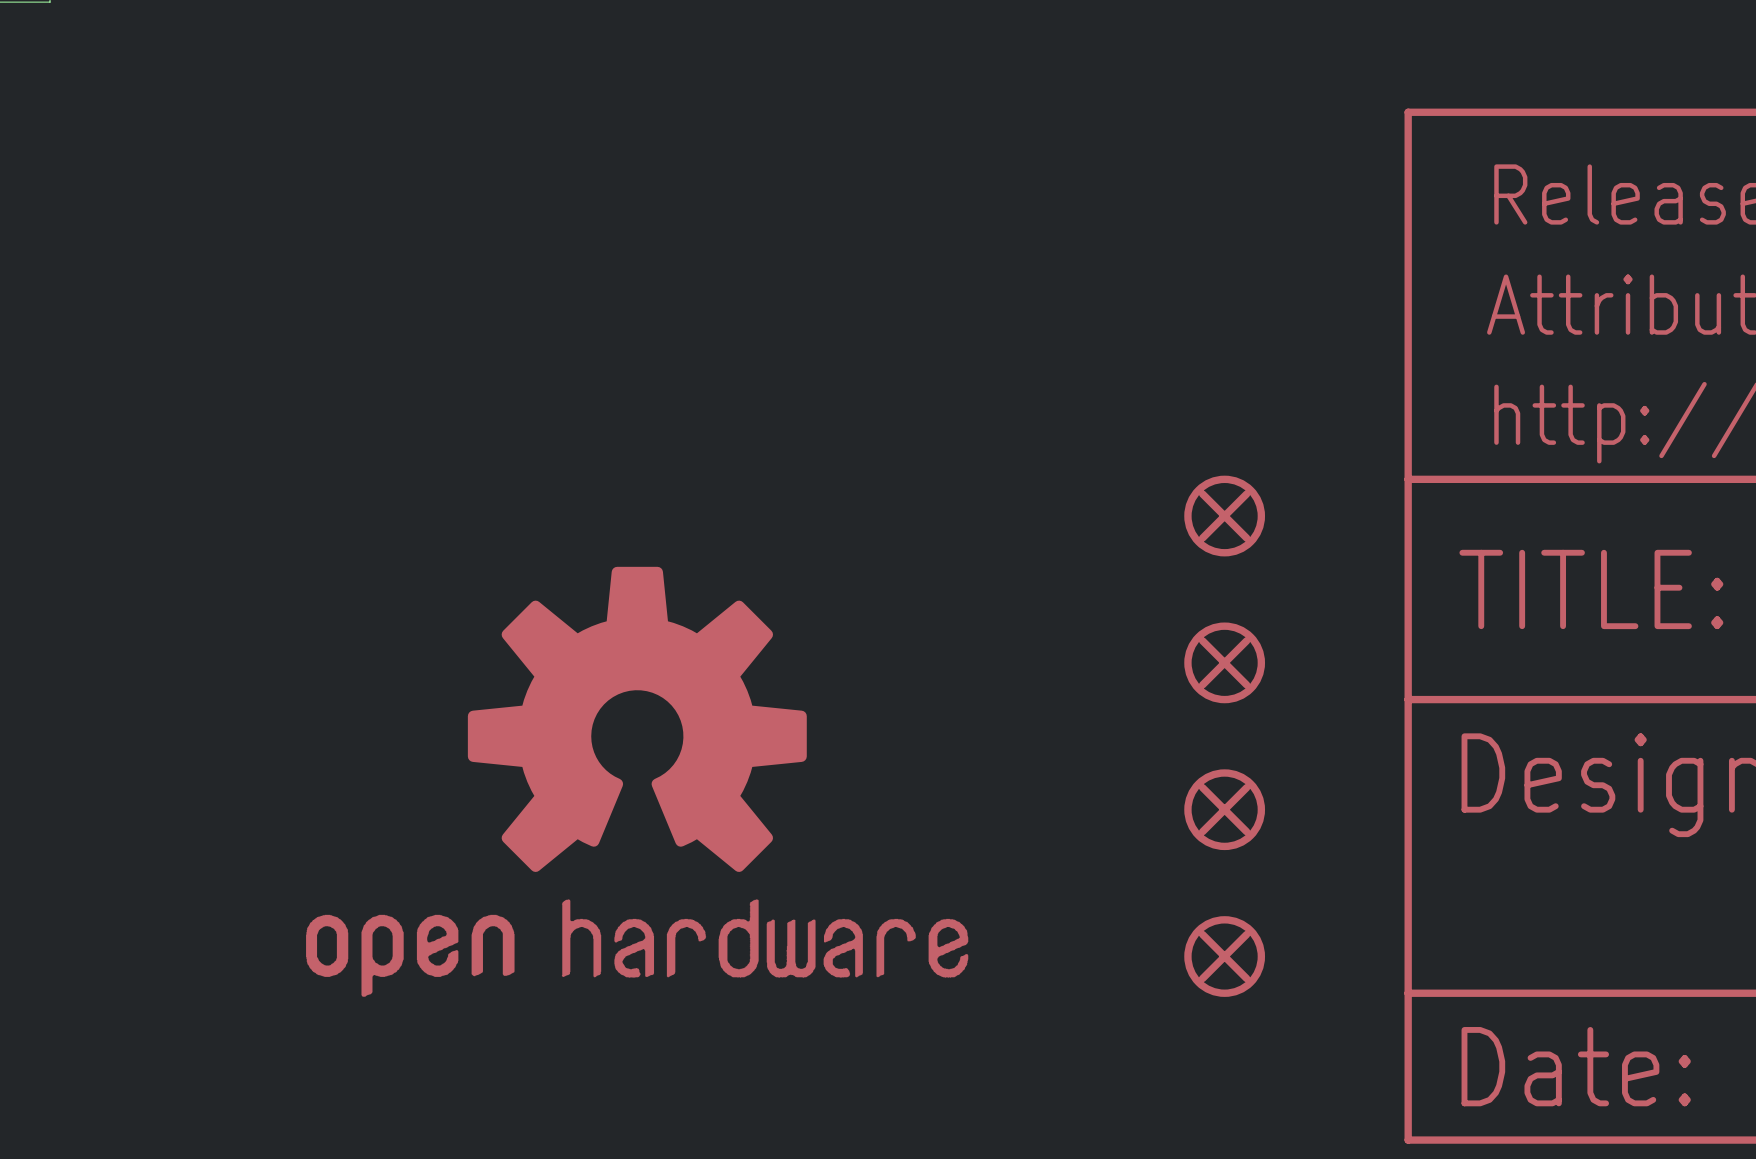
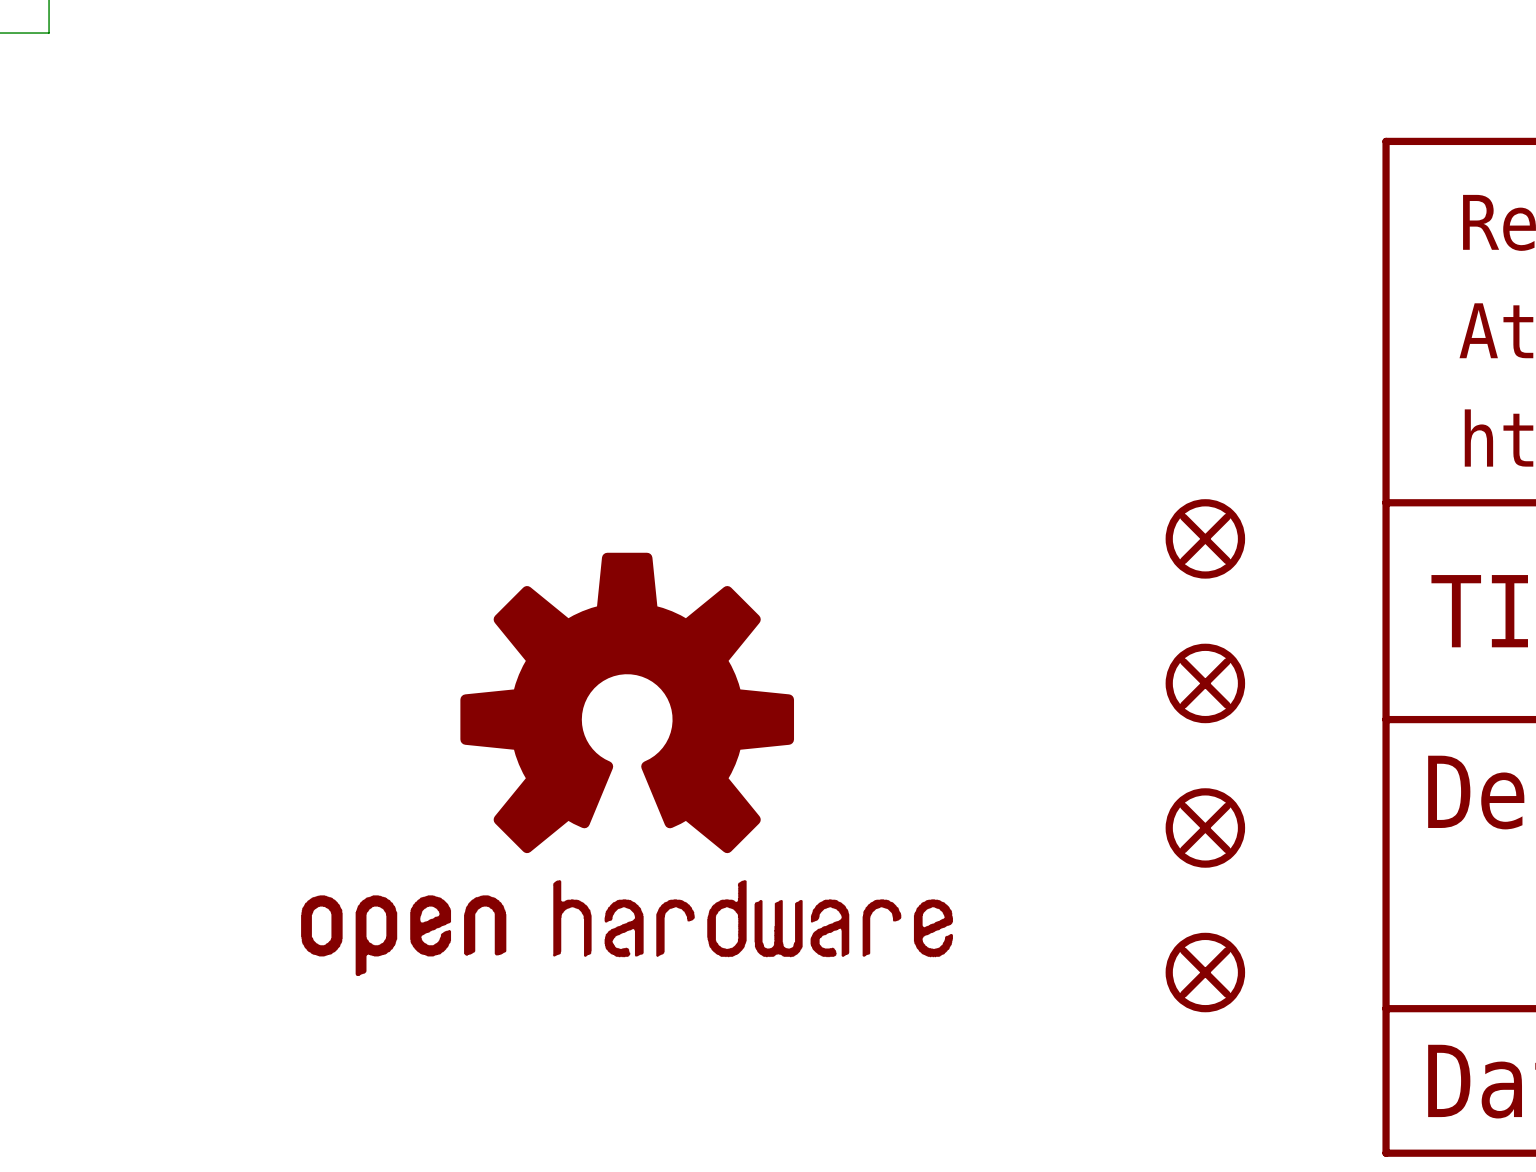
part position: (637, 781) -> (627, 764)

